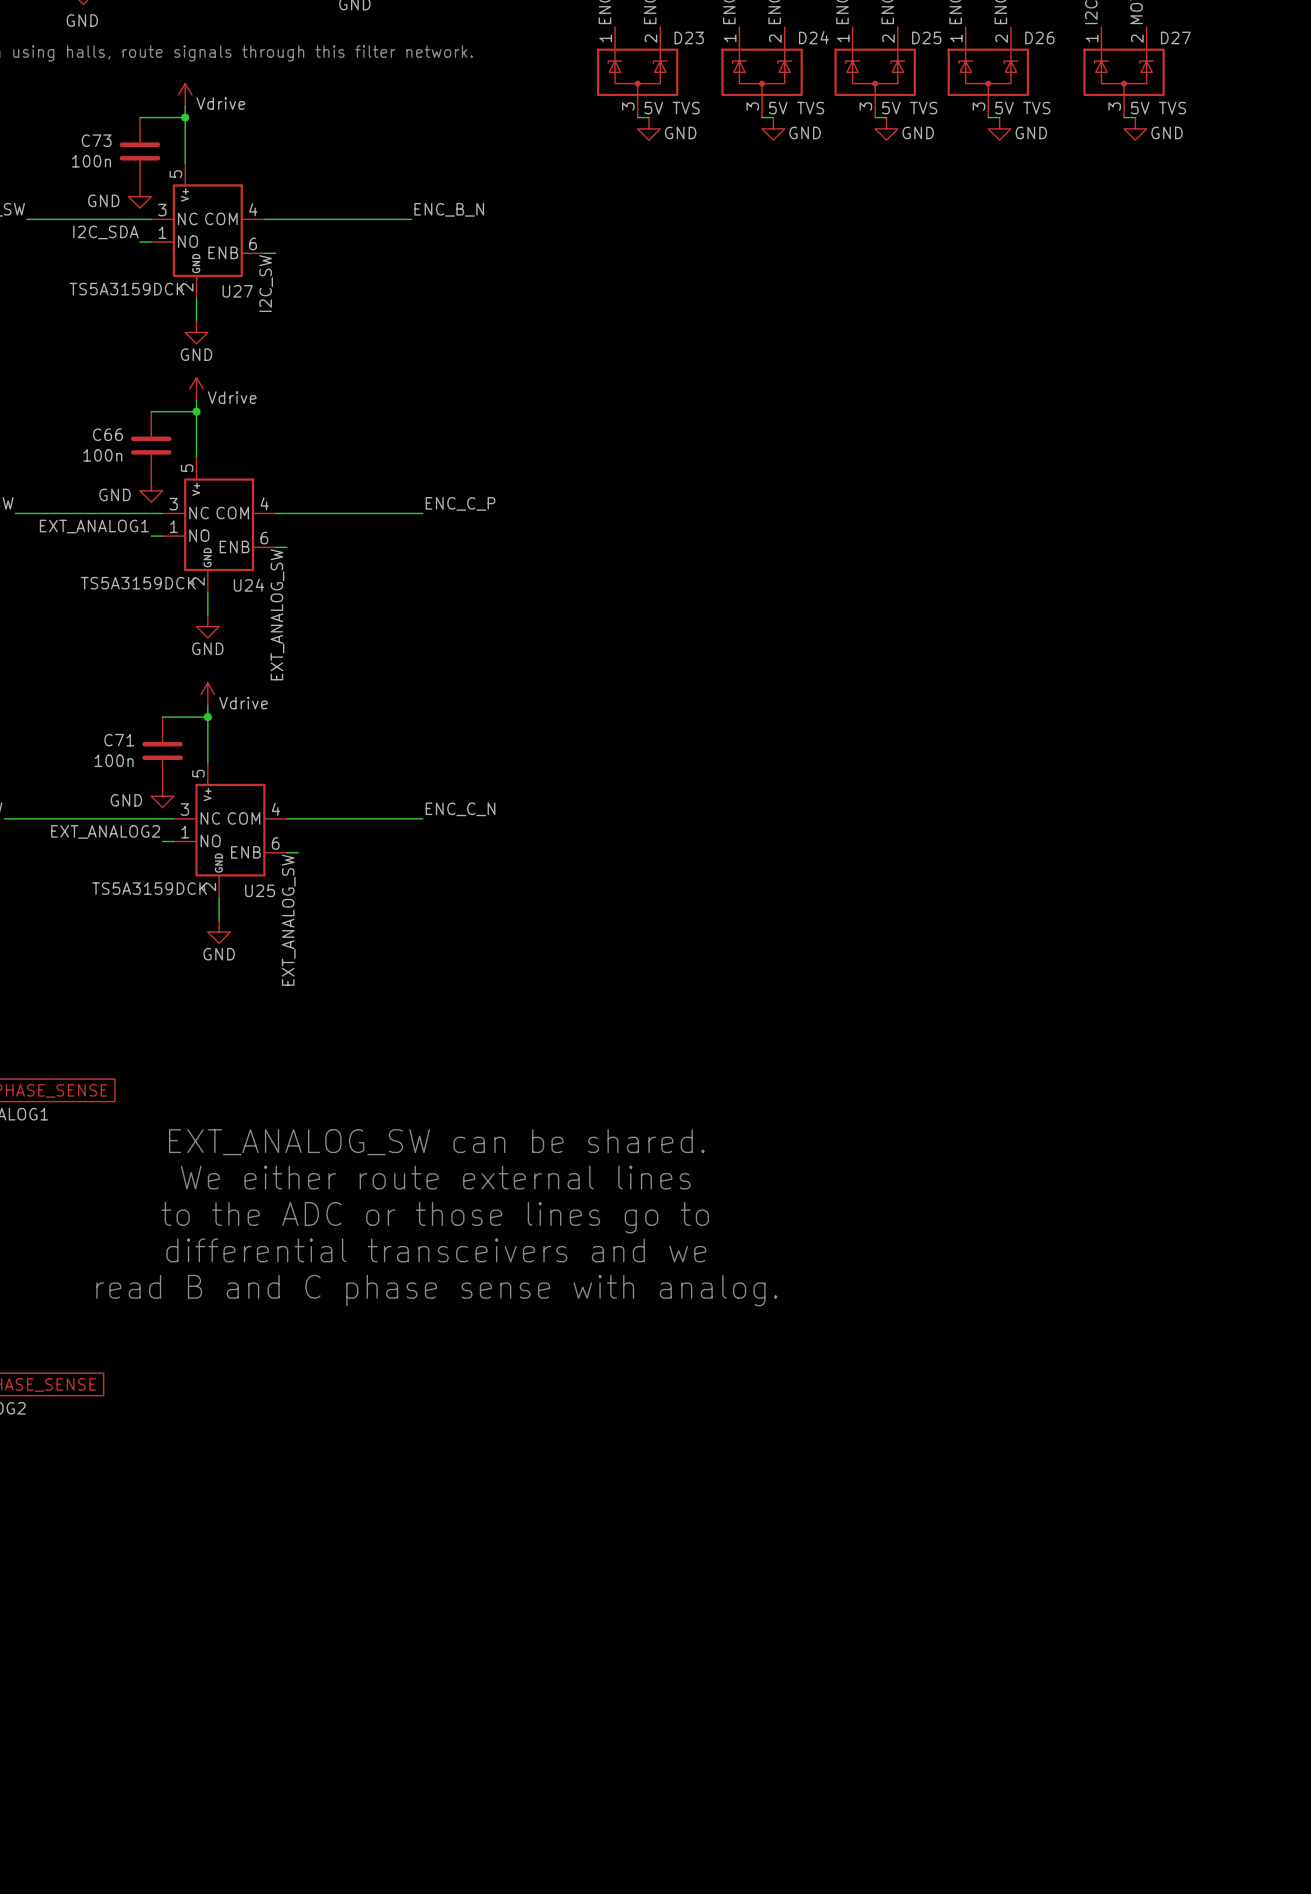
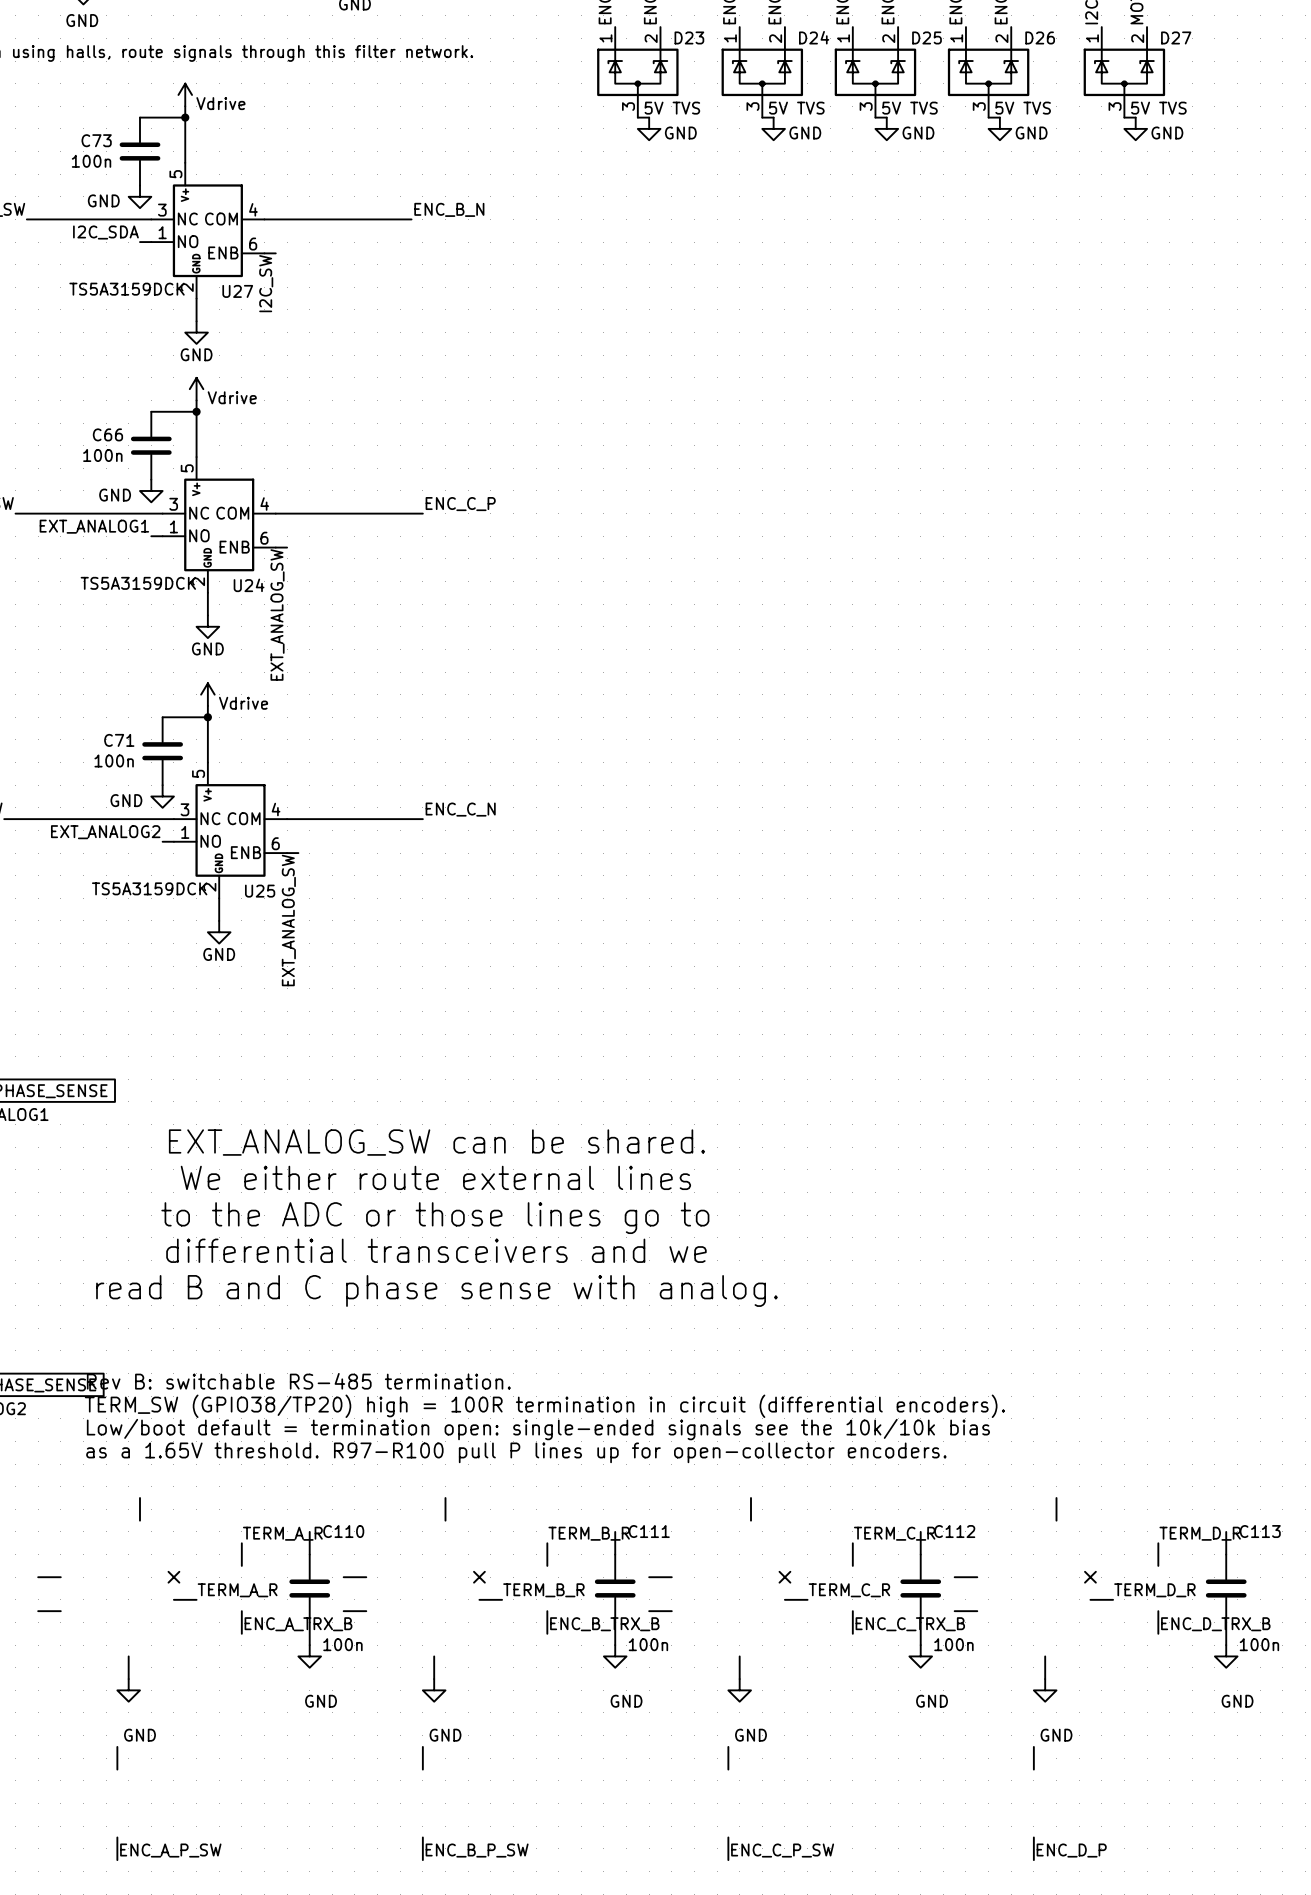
text: none -> Rev B: switchable RS-485 termination. (298, 1381)
text: none -> TERM_SW (GPIO38/TP20) high = 100R termination in circuit (differential encoders). (544, 1406)
text: none -> Low/boot default = termination open: single-ended signals see the 10k/10k bias (538, 1429)
text: none -> as a 1.65V threshold. R97-R100 pull P lines up for open-collector encoders. (516, 1452)
wire: none -> (139, 1498) (139, 1520)
wire: none -> (445, 1498) (445, 1520)
wire: none -> (751, 1498) (751, 1520)
wire: none -> (1056, 1498) (1056, 1520)
wire: none -> (309, 1531) (309, 1554)
wire: none -> (615, 1531) (615, 1554)
wire: none -> (920, 1531) (920, 1554)
wire: none -> (1226, 1531) (1226, 1554)
label: none -> TERM_A_R (282, 1533)
label: none -> TERM_B_R (589, 1533)
label: none -> TERM_C_R (894, 1533)
label: none -> TERM_D_R (1200, 1533)
wire: none -> (241, 1543) (241, 1565)
wire: none -> (547, 1543) (547, 1565)
wire: none -> (852, 1543) (852, 1565)
wire: none -> (1158, 1543) (1158, 1565)
wire: none -> (38, 1577) (60, 1577)
no-connect mark: none -> (173, 1577)
wire: none -> (343, 1577) (366, 1577)
no-connect mark: none -> (479, 1577)
wire: none -> (649, 1577) (671, 1577)
no-connect mark: none -> (784, 1577)
wire: none -> (954, 1577) (977, 1577)
no-connect mark: none -> (1090, 1577)
C110: none -> 100n (309, 1588)
C111: none -> 100n (615, 1588)
C112: none -> 100n (920, 1588)
C113: none -> 100n (1226, 1588)
label: none -> TERM_A_R (237, 1590)
label: none -> TERM_B_R (543, 1590)
label: none -> TERM_C_R (849, 1590)
label: none -> TERM_D_R (1154, 1590)
wire: none -> (173, 1599) (196, 1599)
wire: none -> (479, 1599) (502, 1599)
wire: none -> (784, 1599) (807, 1599)
wire: none -> (1090, 1599) (1113, 1599)
wire: none -> (38, 1611) (60, 1611)
wire: none -> (241, 1611) (241, 1633)
wire: none -> (343, 1611) (366, 1611)
wire: none -> (547, 1611) (547, 1633)
wire: none -> (649, 1611) (671, 1611)
wire: none -> (852, 1611) (852, 1633)
wire: none -> (954, 1611) (977, 1611)
wire: none -> (1158, 1611) (1158, 1633)
wire: none -> (309, 1622) (309, 1645)
wire: none -> (615, 1622) (615, 1645)
wire: none -> (920, 1622) (920, 1645)
wire: none -> (1226, 1622) (1226, 1645)
label: none -> ENC_A_TRX_B (298, 1624)
label: none -> ENC_B_TRX_B (604, 1624)
label: none -> ENC_C_TRX_B (910, 1624)
label: none -> ENC_D_TRX_B (1215, 1624)
wire: none -> (128, 1656) (128, 1679)
power symbol: none -> GND (309, 1656)
wire: none -> (434, 1656) (434, 1679)
power symbol: none -> GND (615, 1656)
wire: none -> (739, 1656) (739, 1679)
power symbol: none -> GND (920, 1656)
wire: none -> (1045, 1656) (1045, 1679)
power symbol: none -> GND (1226, 1656)
power symbol: none -> GND (128, 1690)
power symbol: none -> GND (434, 1690)
power symbol: none -> GND (739, 1690)
power symbol: none -> GND (1045, 1690)
wire: none -> (117, 1746) (117, 1769)
wire: none -> (422, 1746) (422, 1769)
wire: none -> (728, 1746) (728, 1769)
wire: none -> (1033, 1746) (1033, 1769)
wire: none -> (117, 1837) (117, 1860)
wire: none -> (422, 1837) (422, 1860)
wire: none -> (728, 1837) (728, 1860)
wire: none -> (1033, 1837) (1033, 1860)
label: none -> ENC_A_P_SW (170, 1850)
label: none -> ENC_B_P_SW (477, 1850)
label: none -> ENC_C_P_SW (782, 1850)
label: none -> ENC_D_P (1071, 1850)

